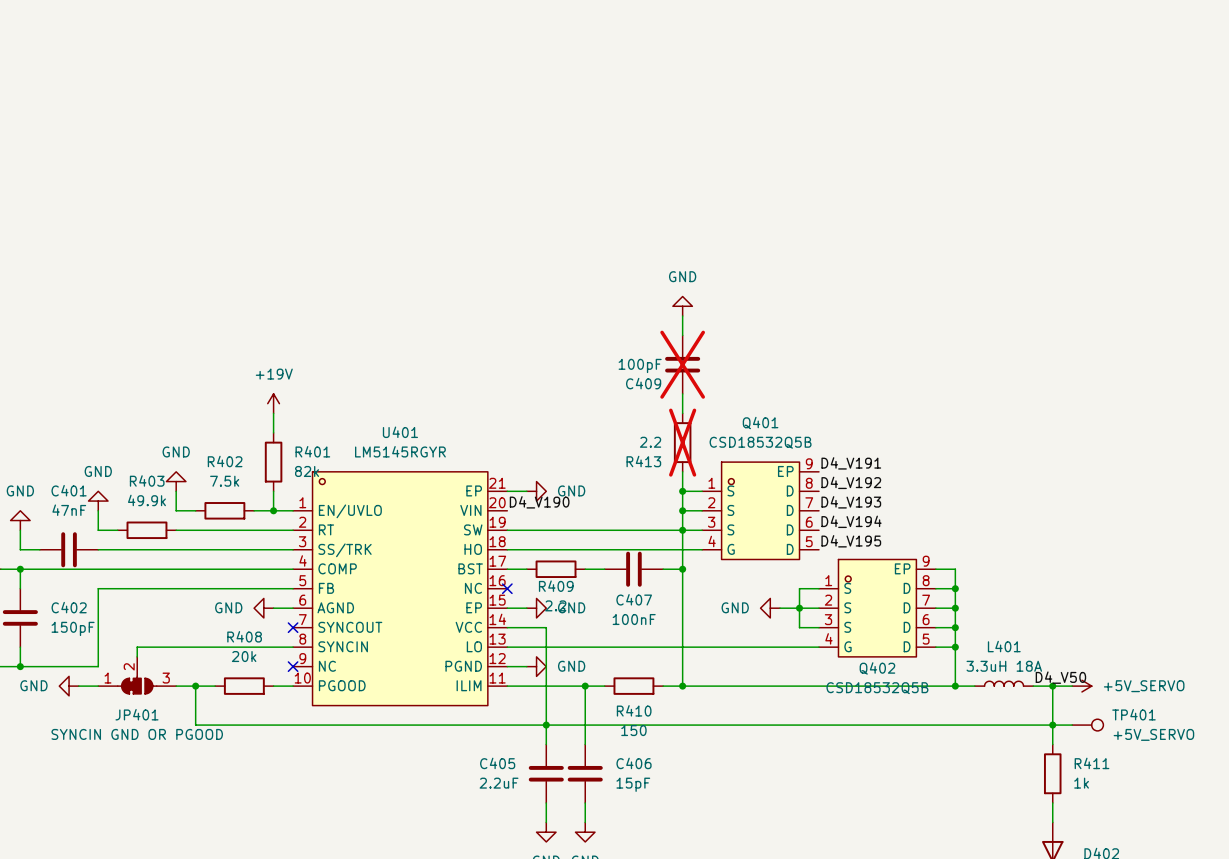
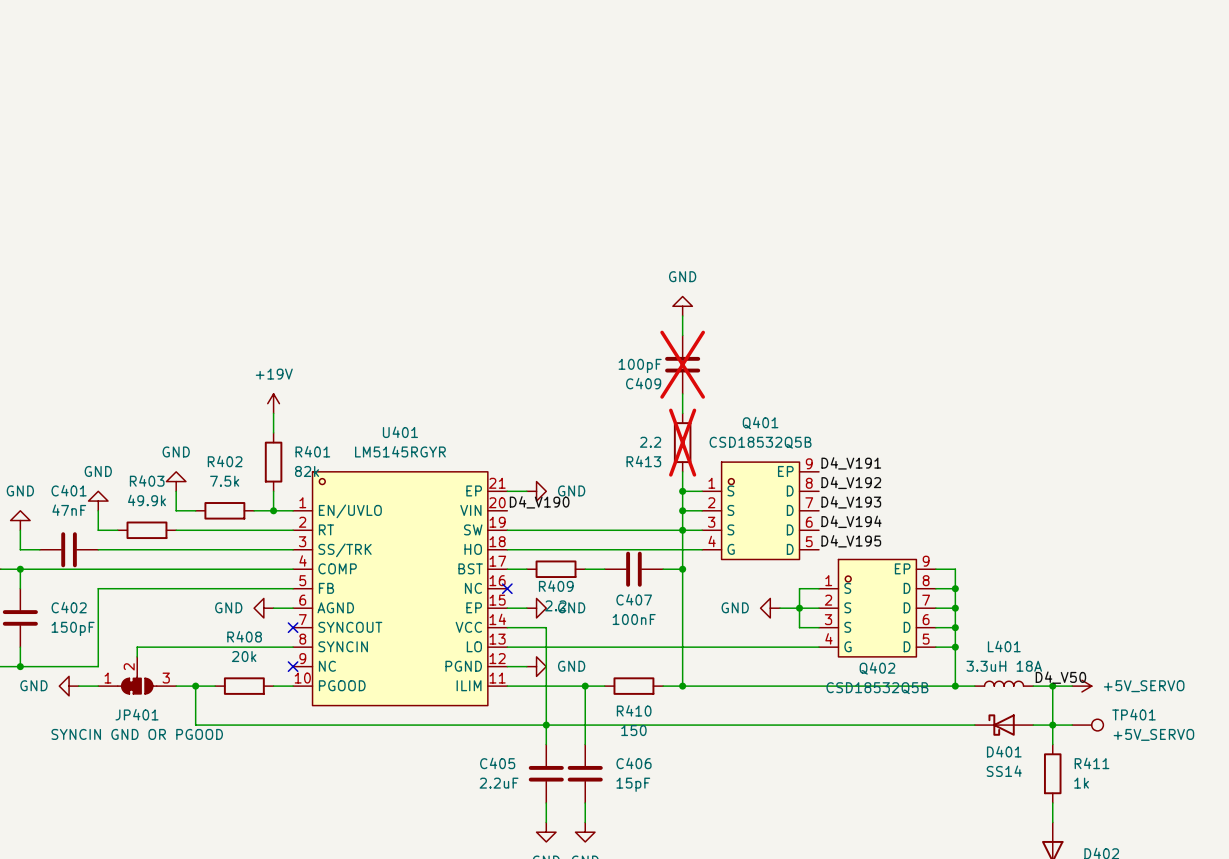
D401: none -> SS14 (1004, 725)

